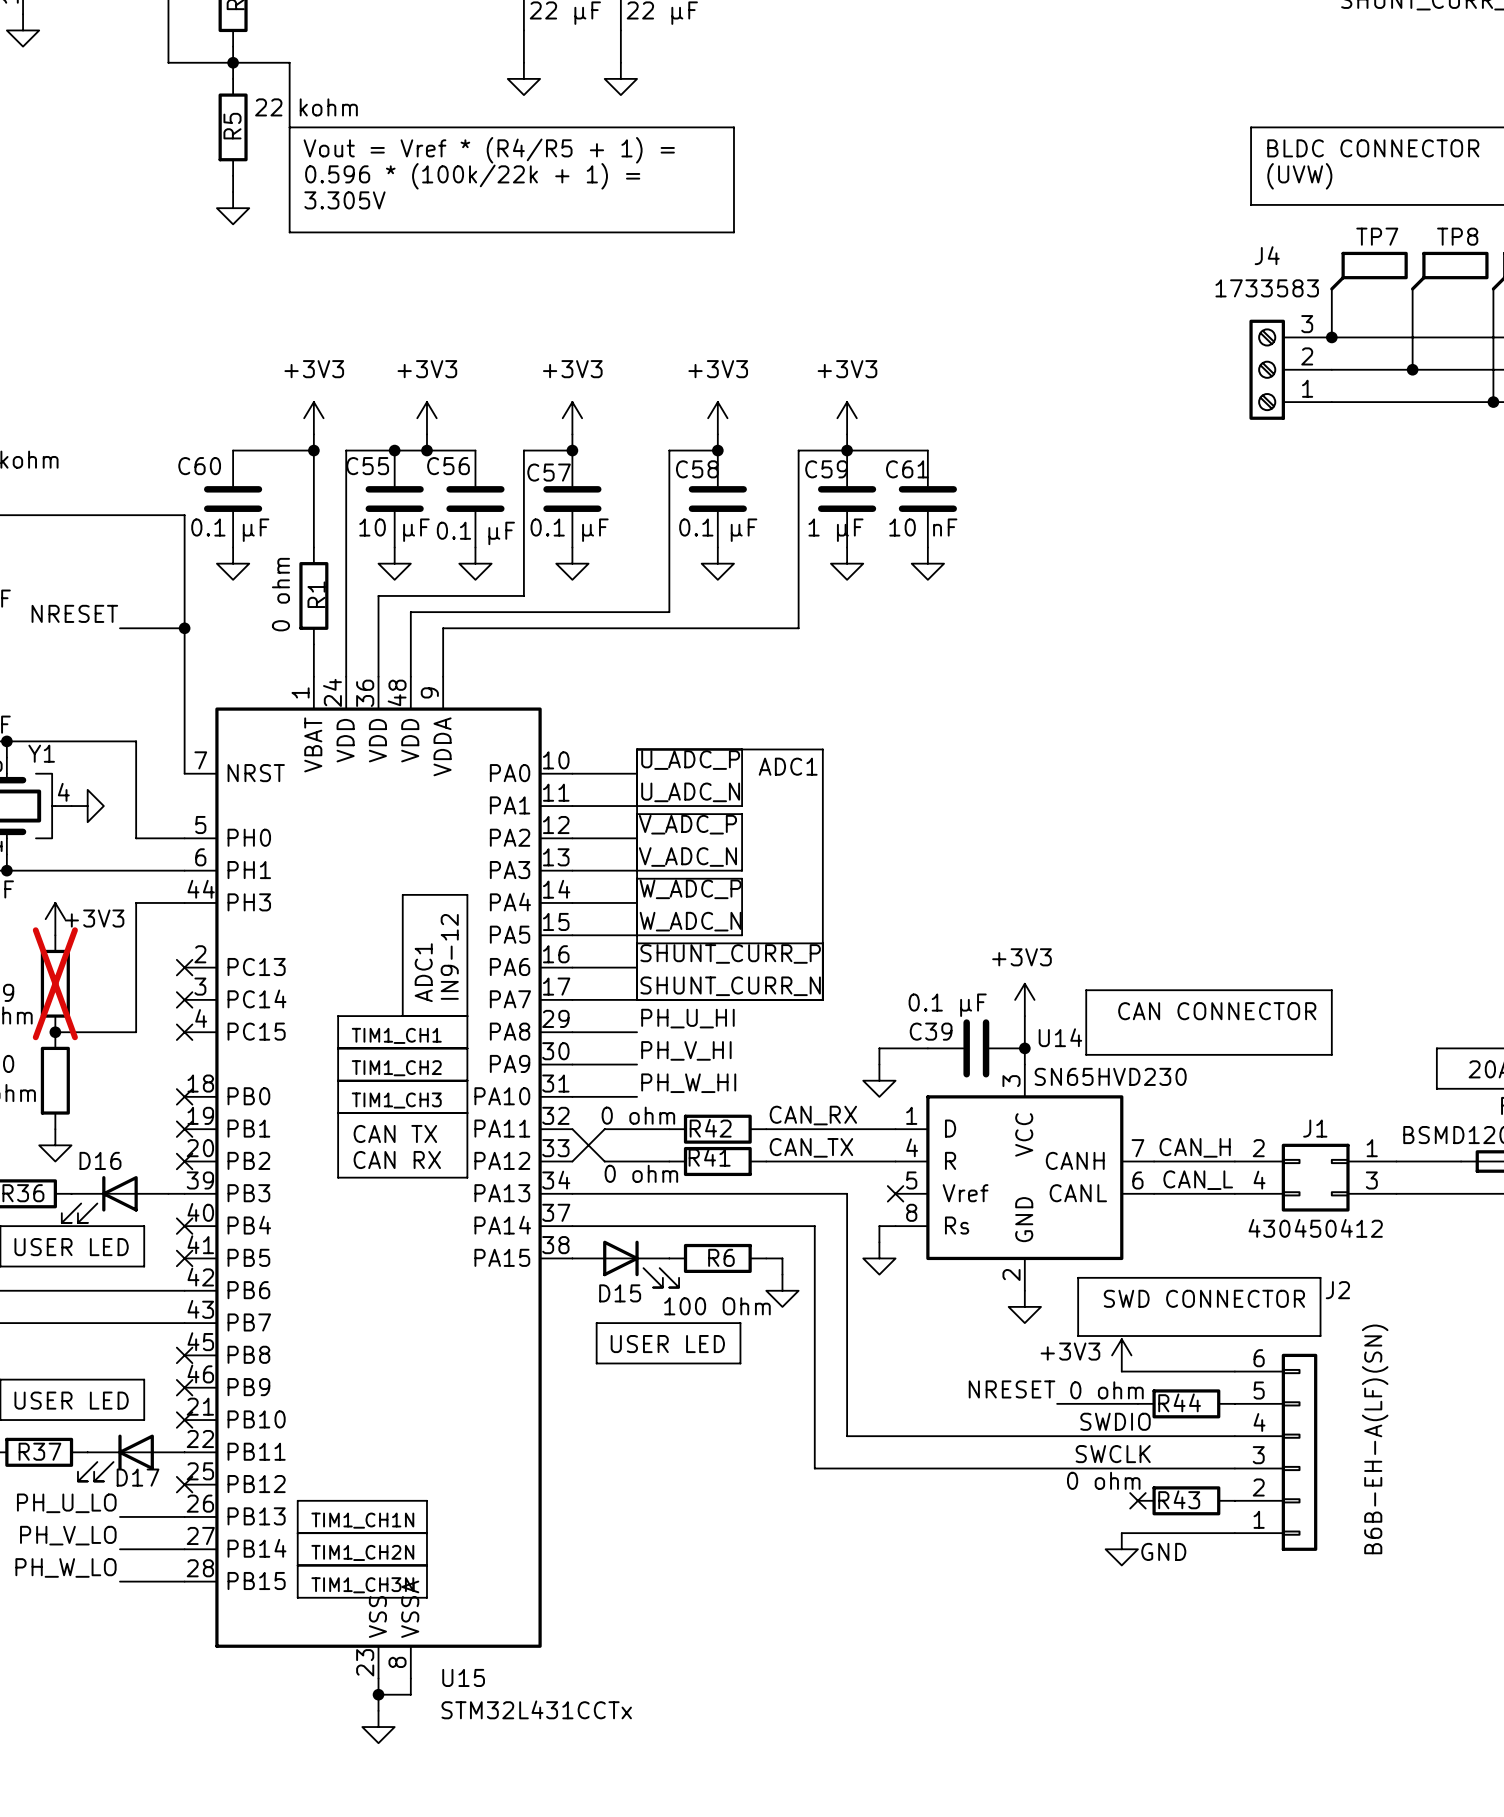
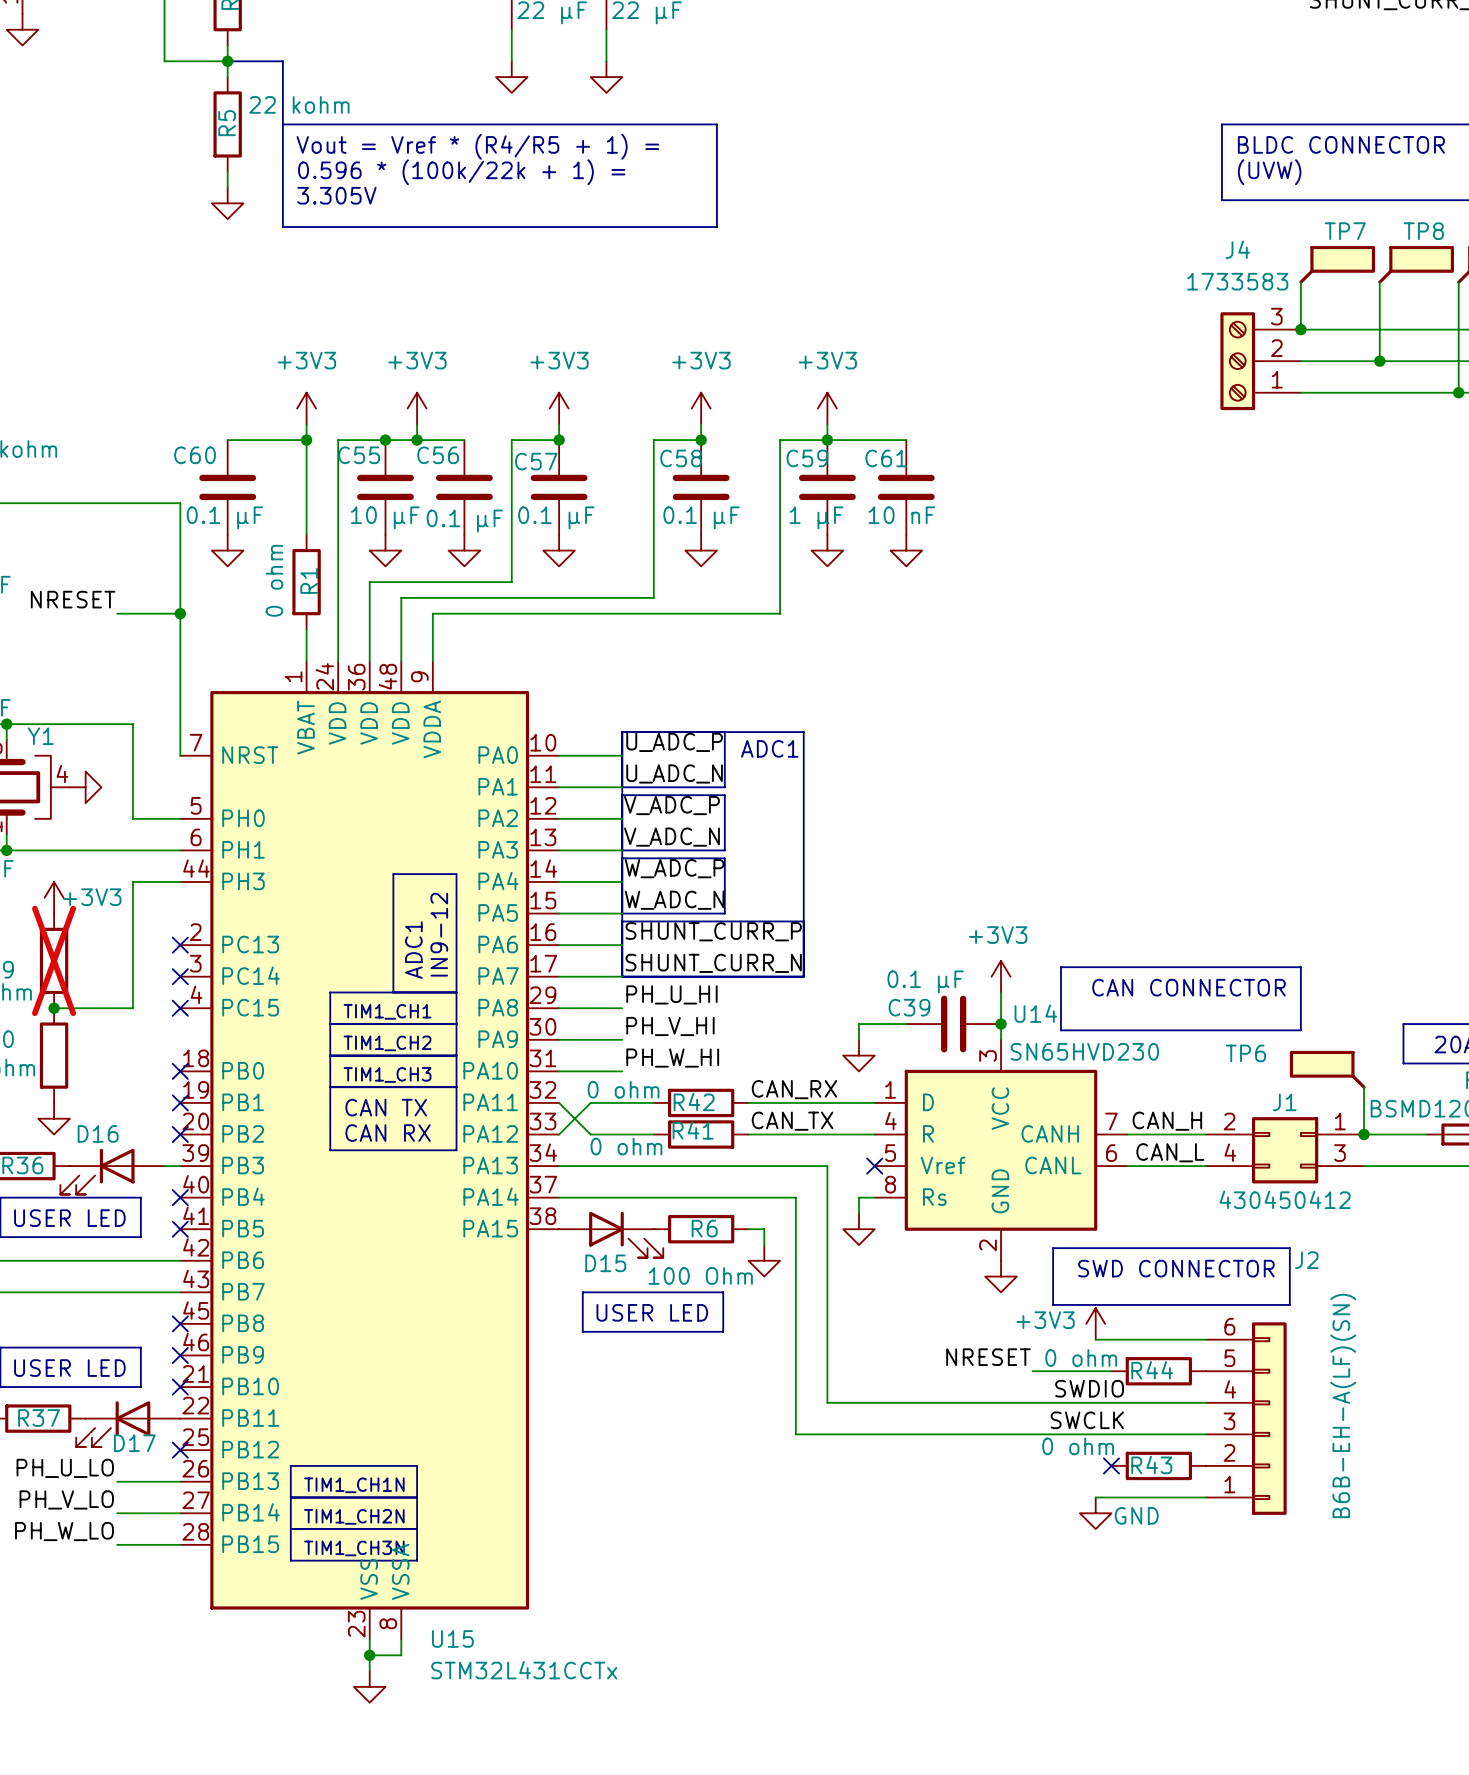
TP6: none -> (1327, 1069)
wire: none -> (1364, 1087) (1364, 1134)
junction: none -> (1364, 1134)

